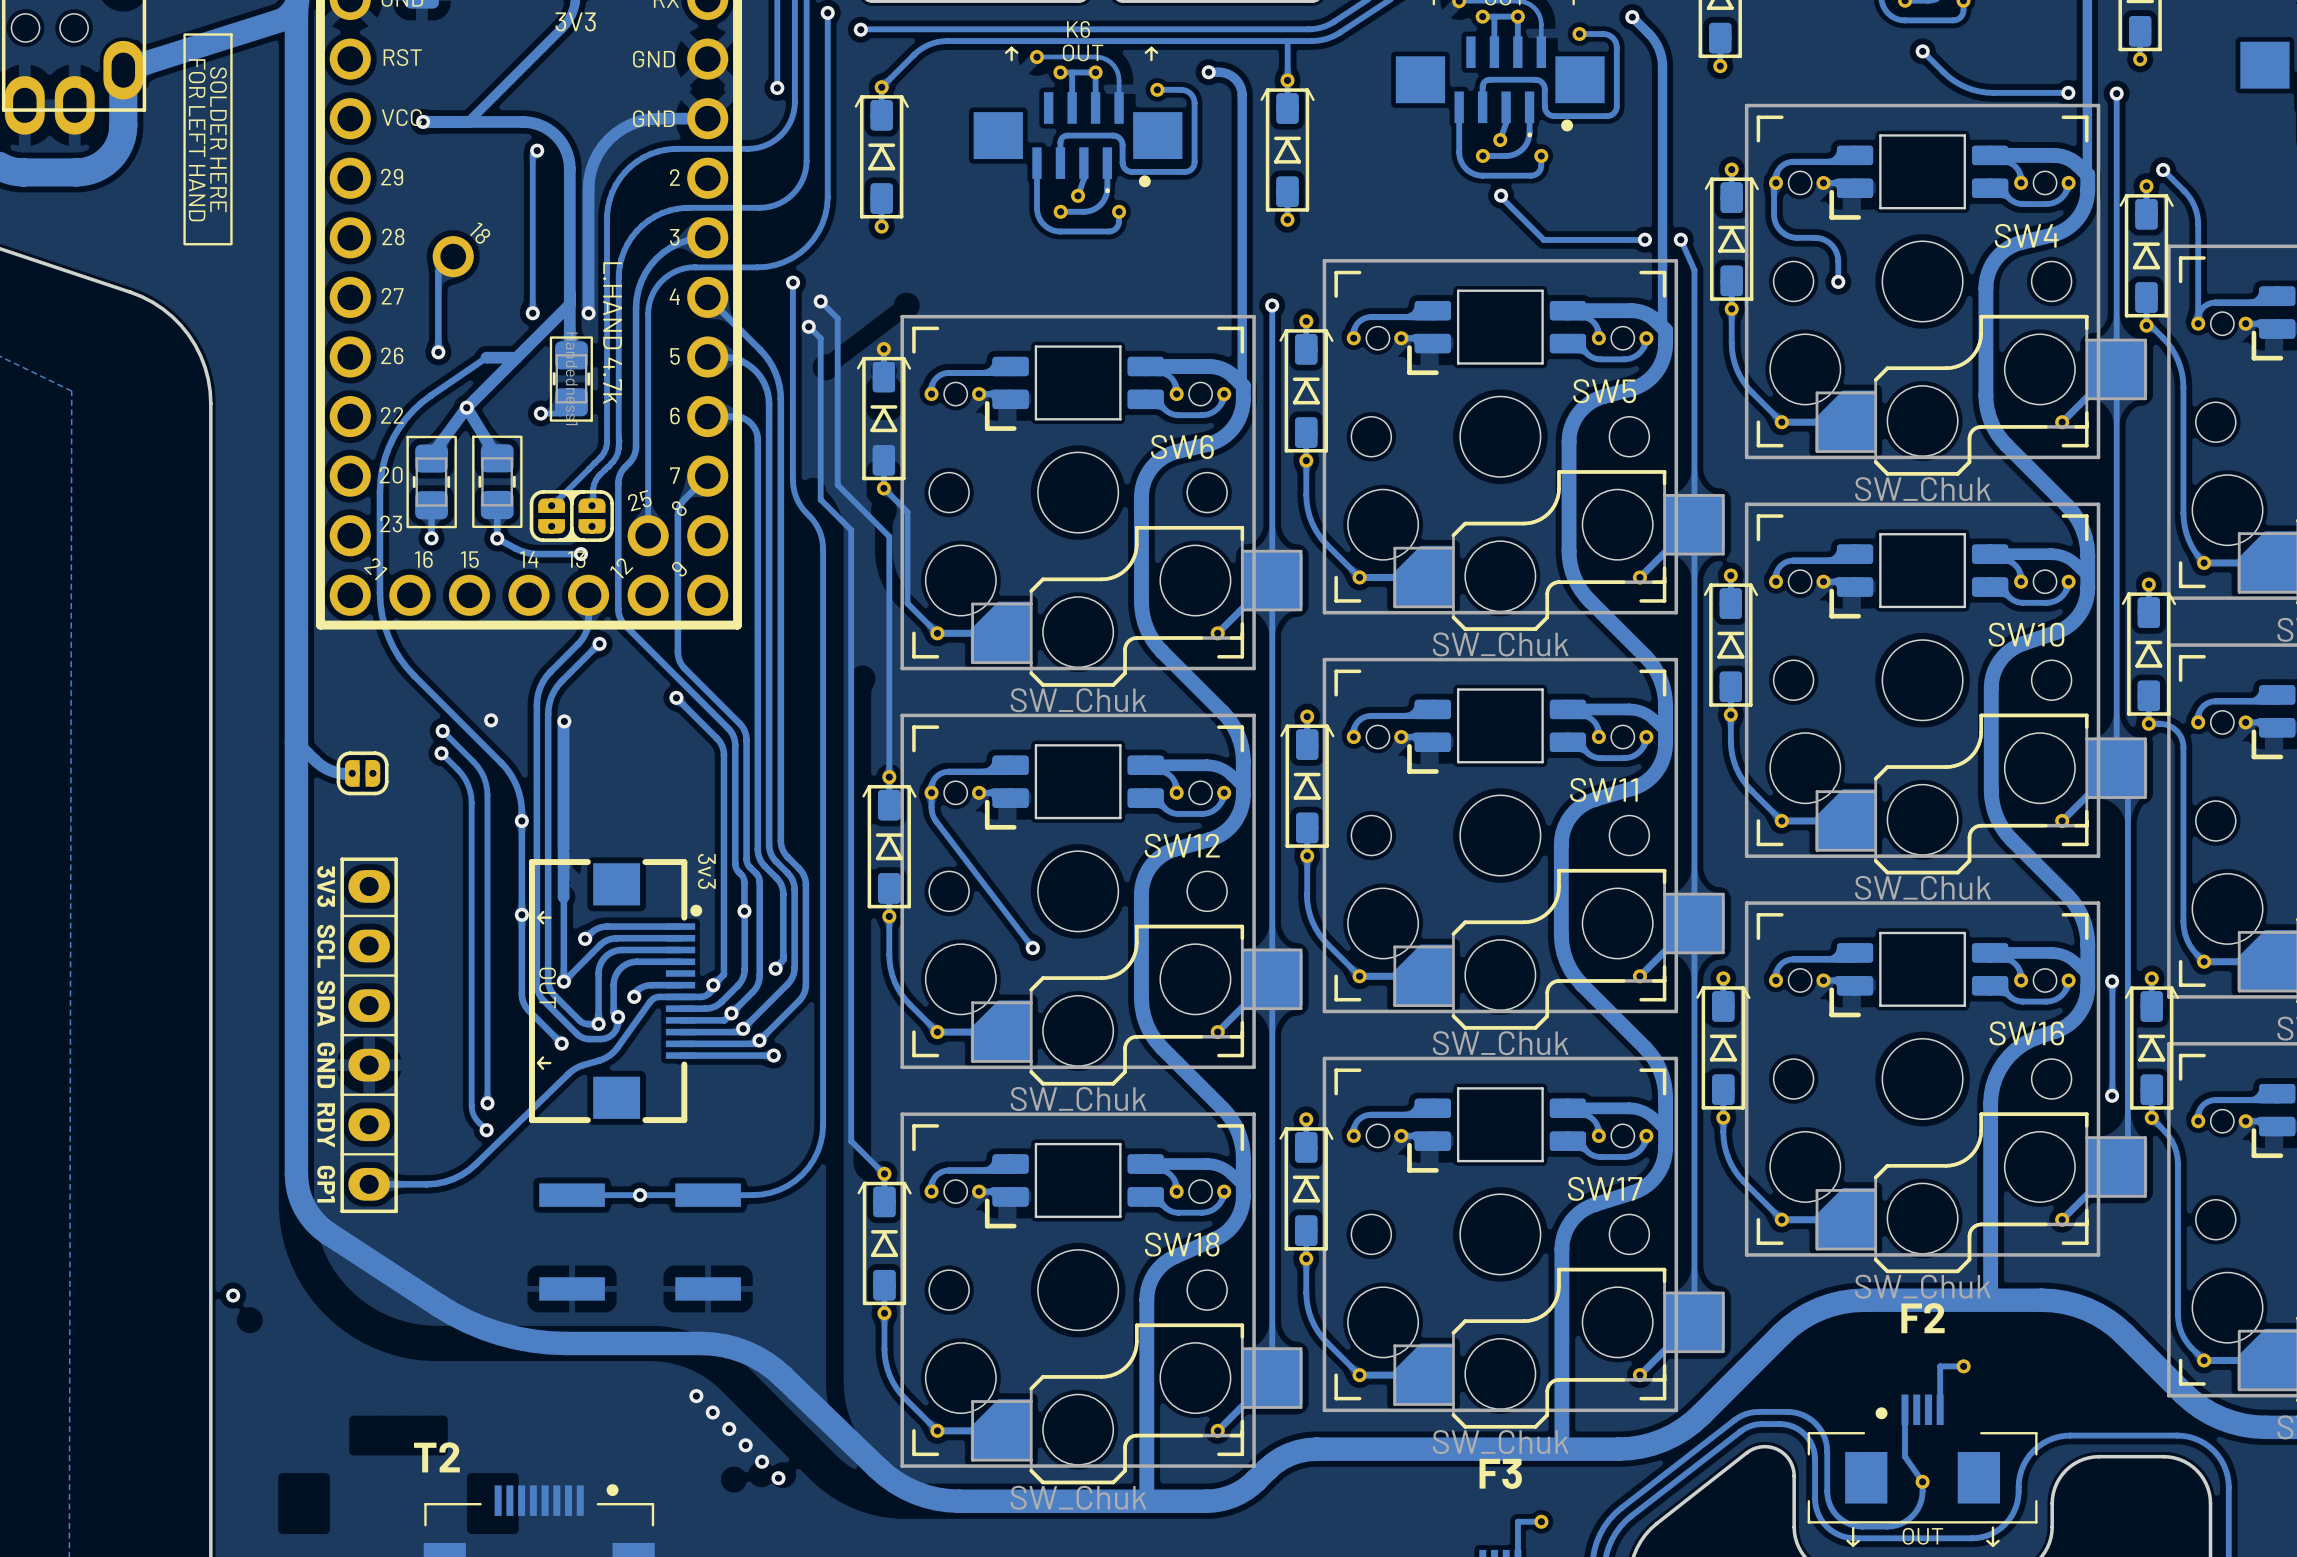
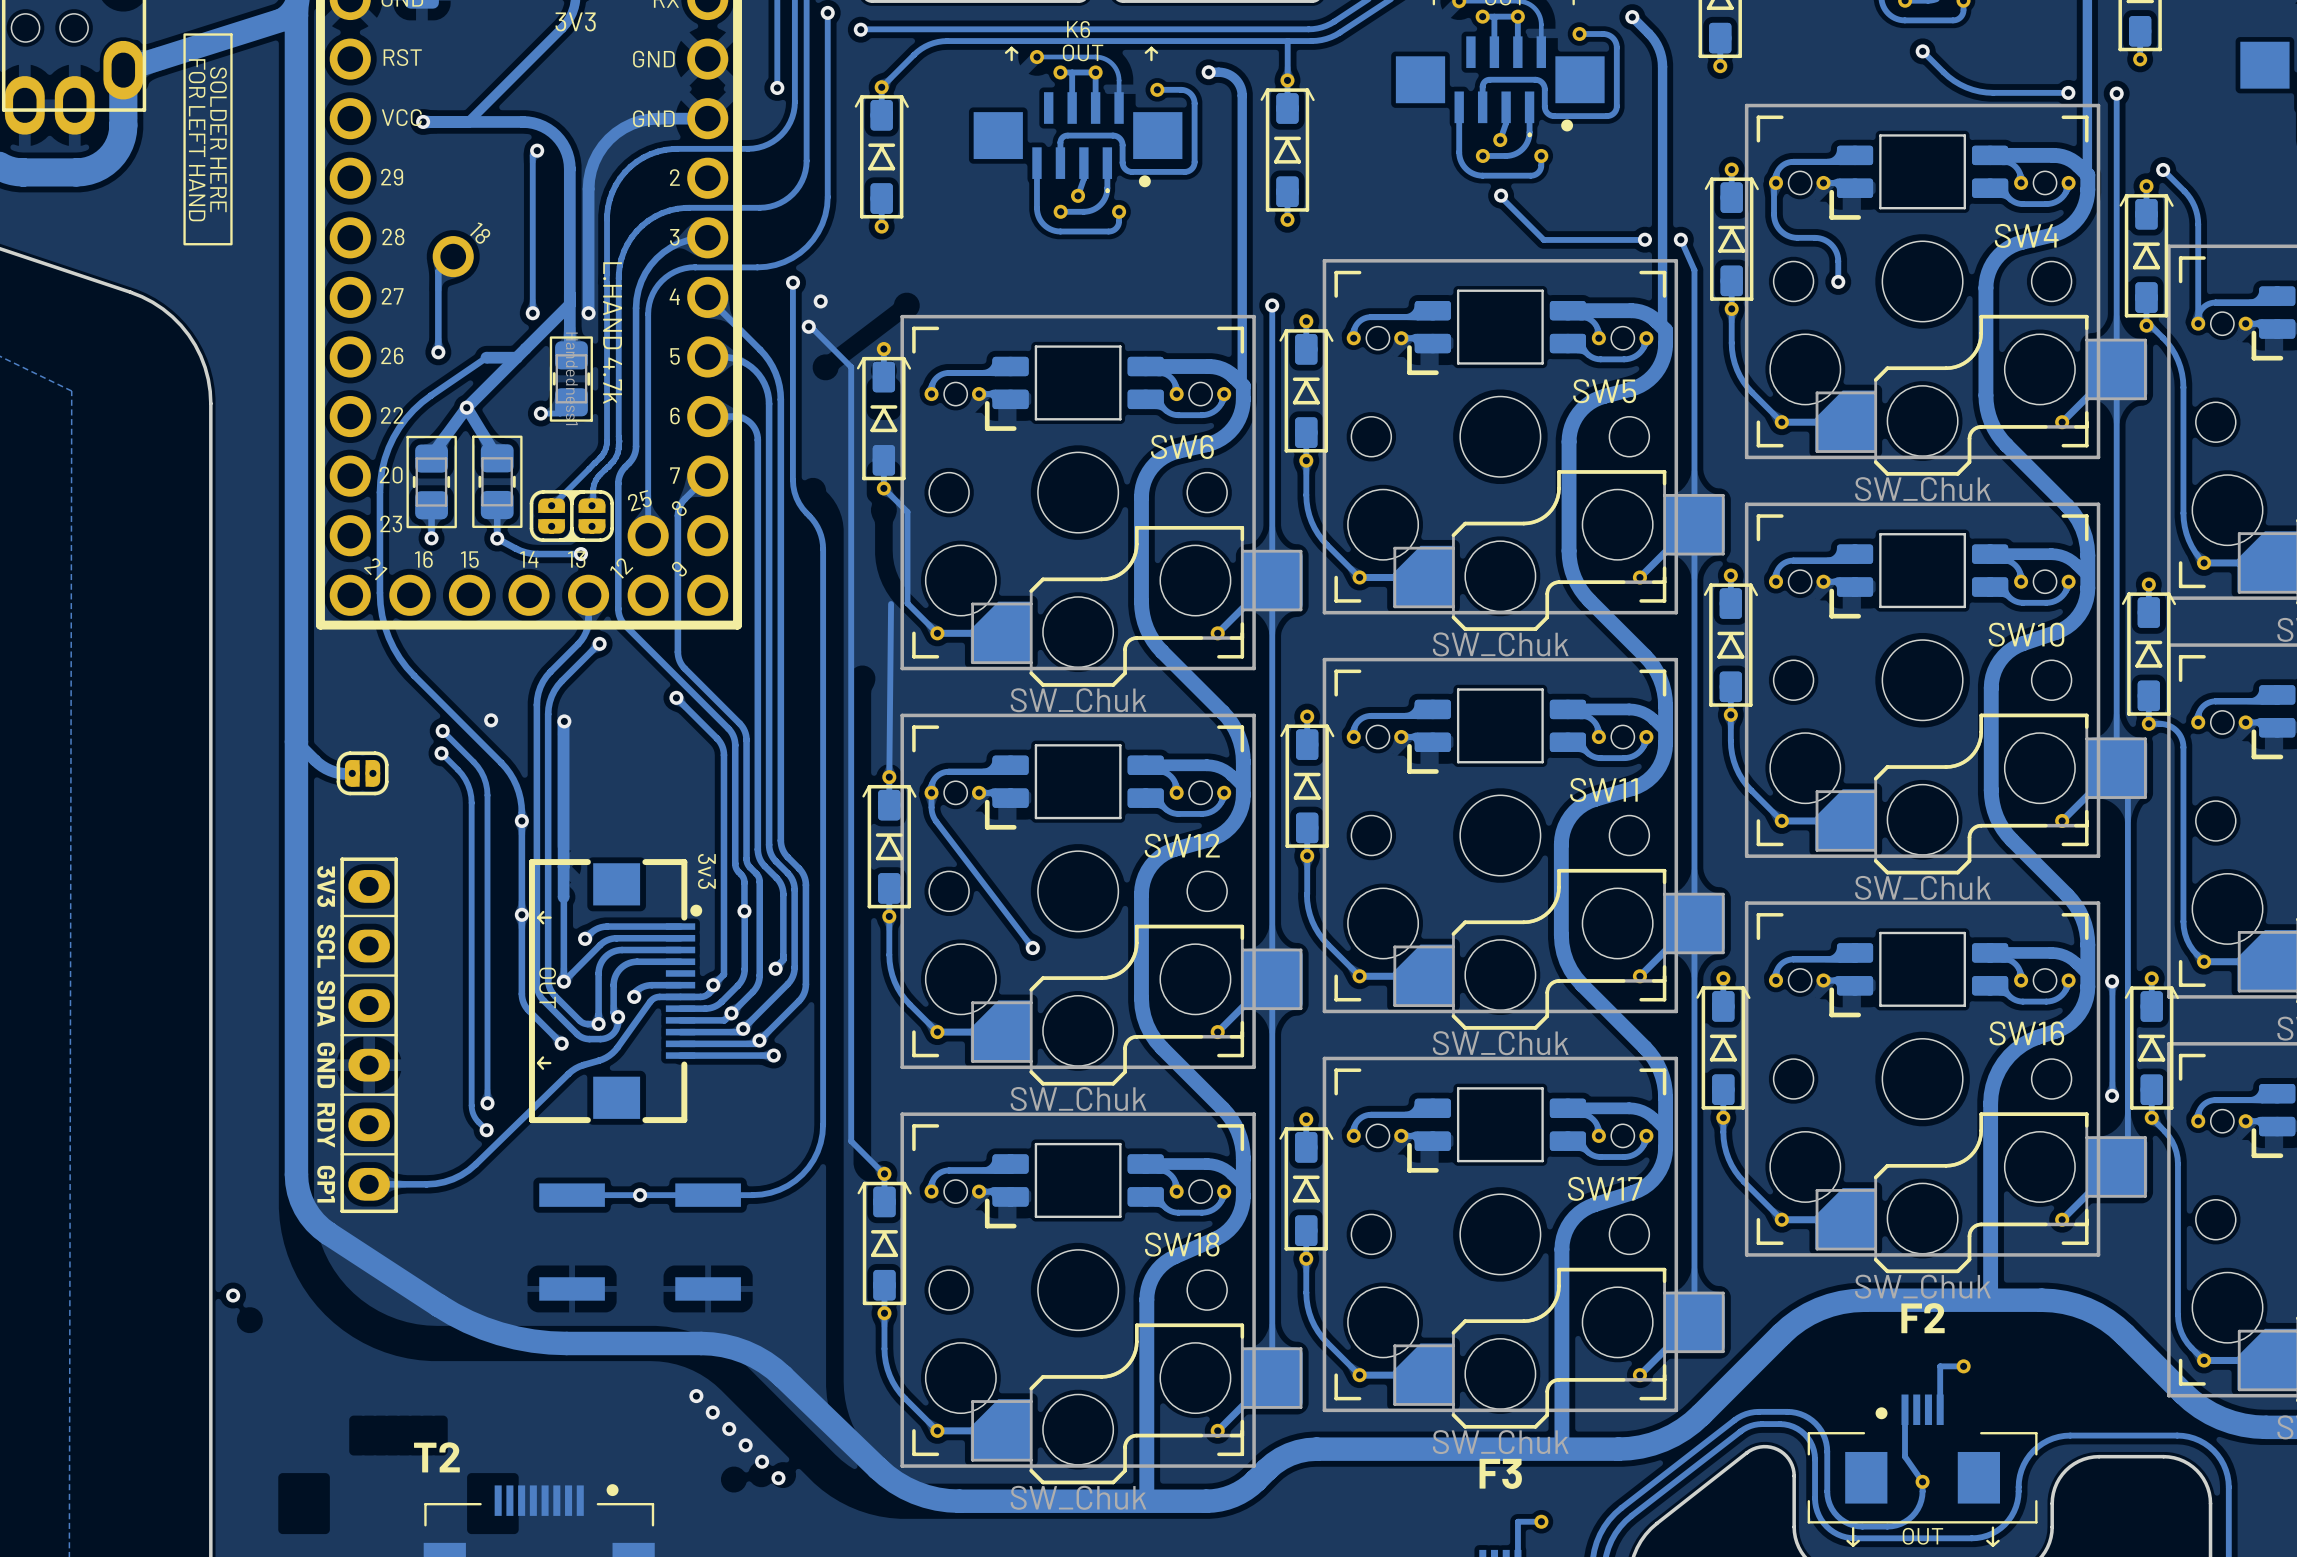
track: (820, 301) (837, 318) (837, 484) (889, 536) (889, 777) -> (891, 604) (889, 777)
track: (807, 326) (820, 338) (820, 499) (851, 530) -> (808, 329) (813, 329) (851, 367) (851, 530)

